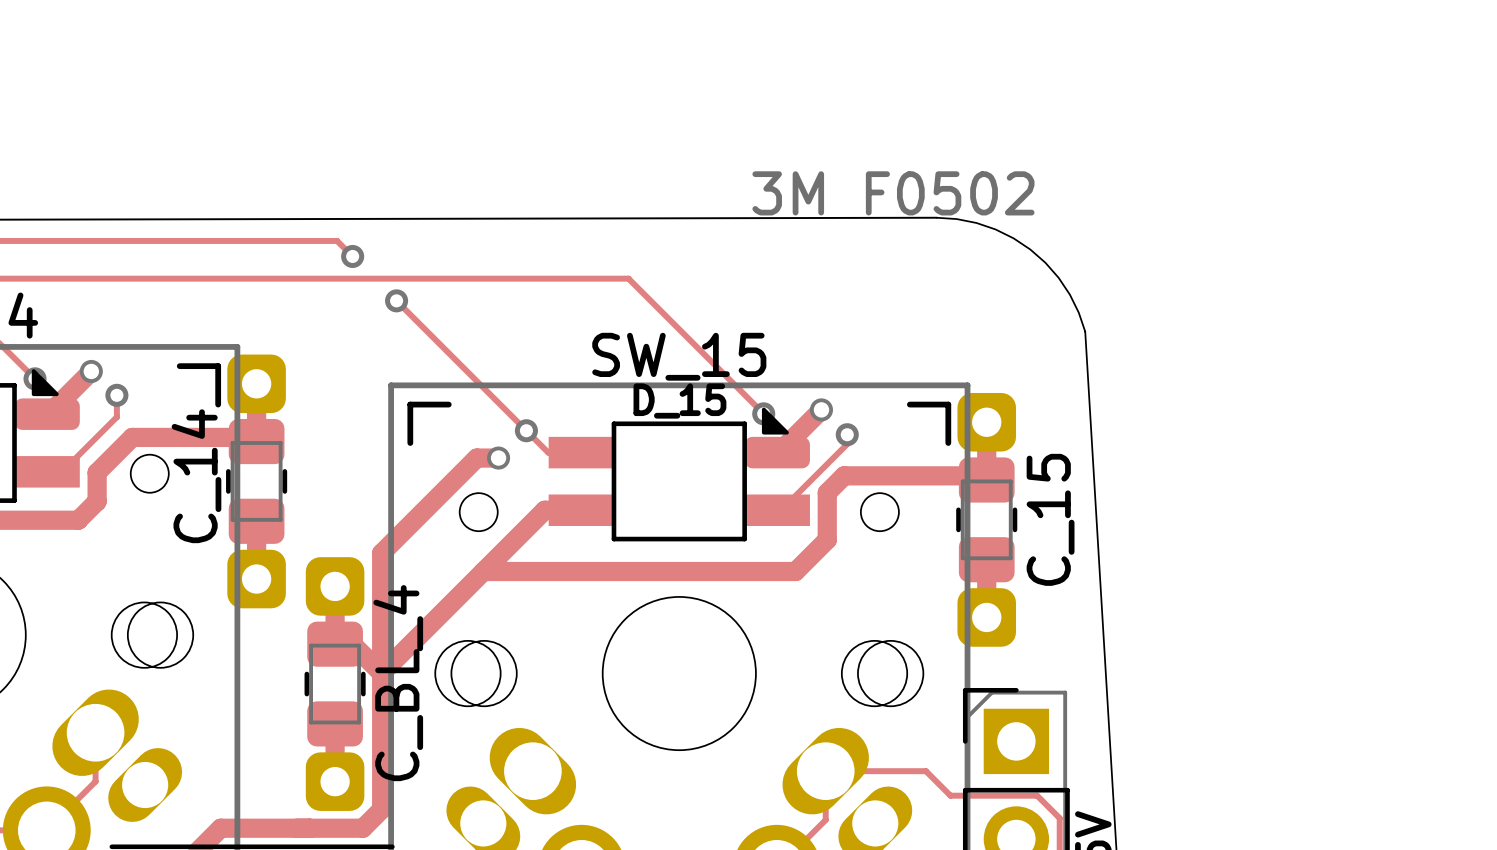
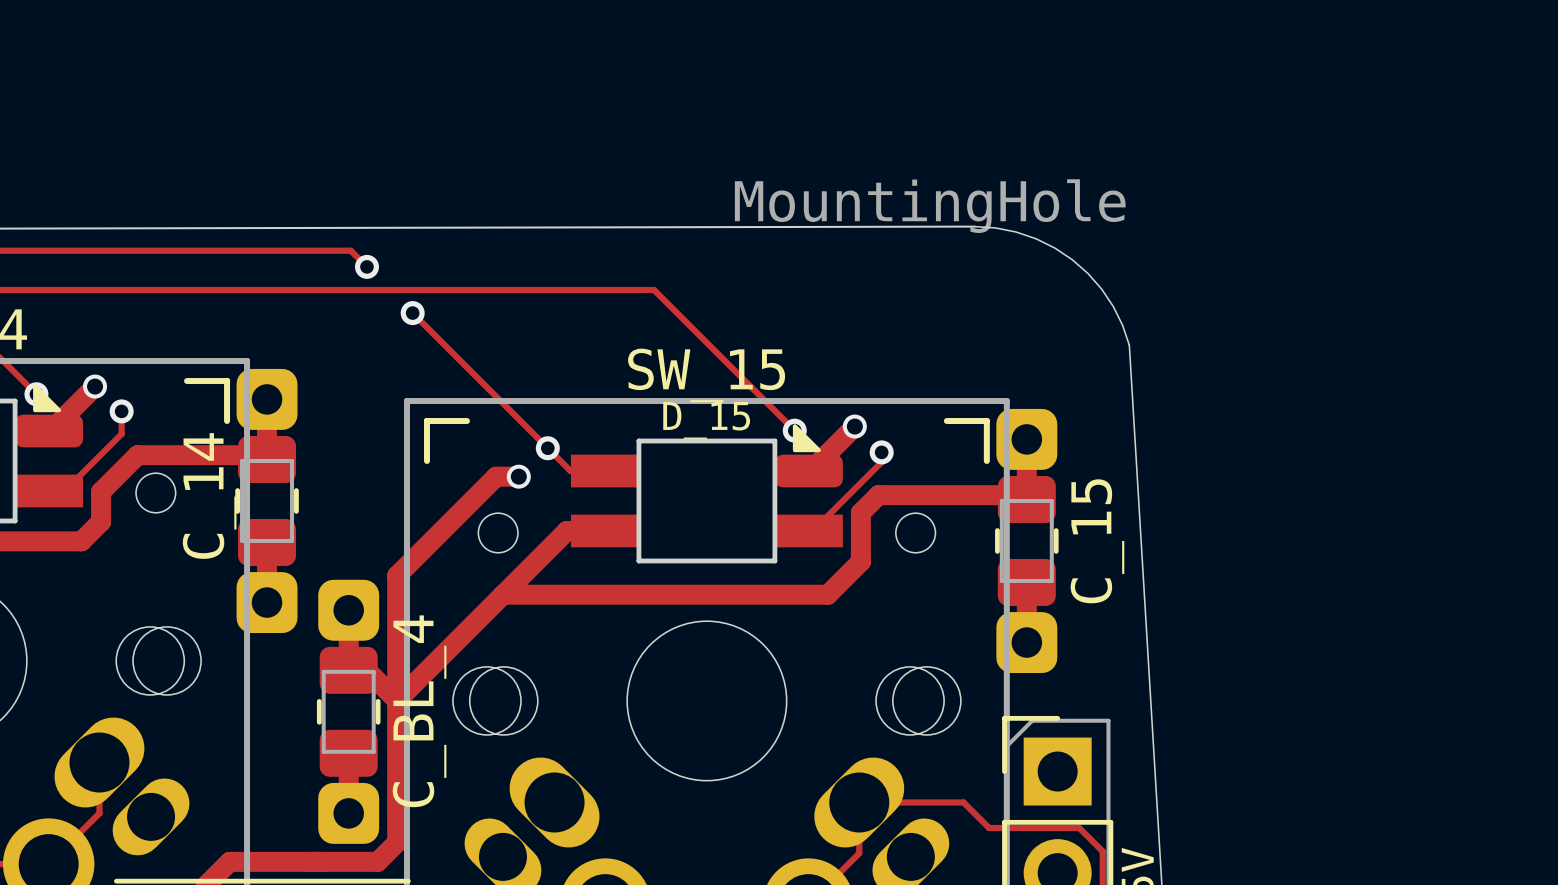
drawing shape: [752, 171, 1035, 216] -> [734, 179, 1126, 234]

